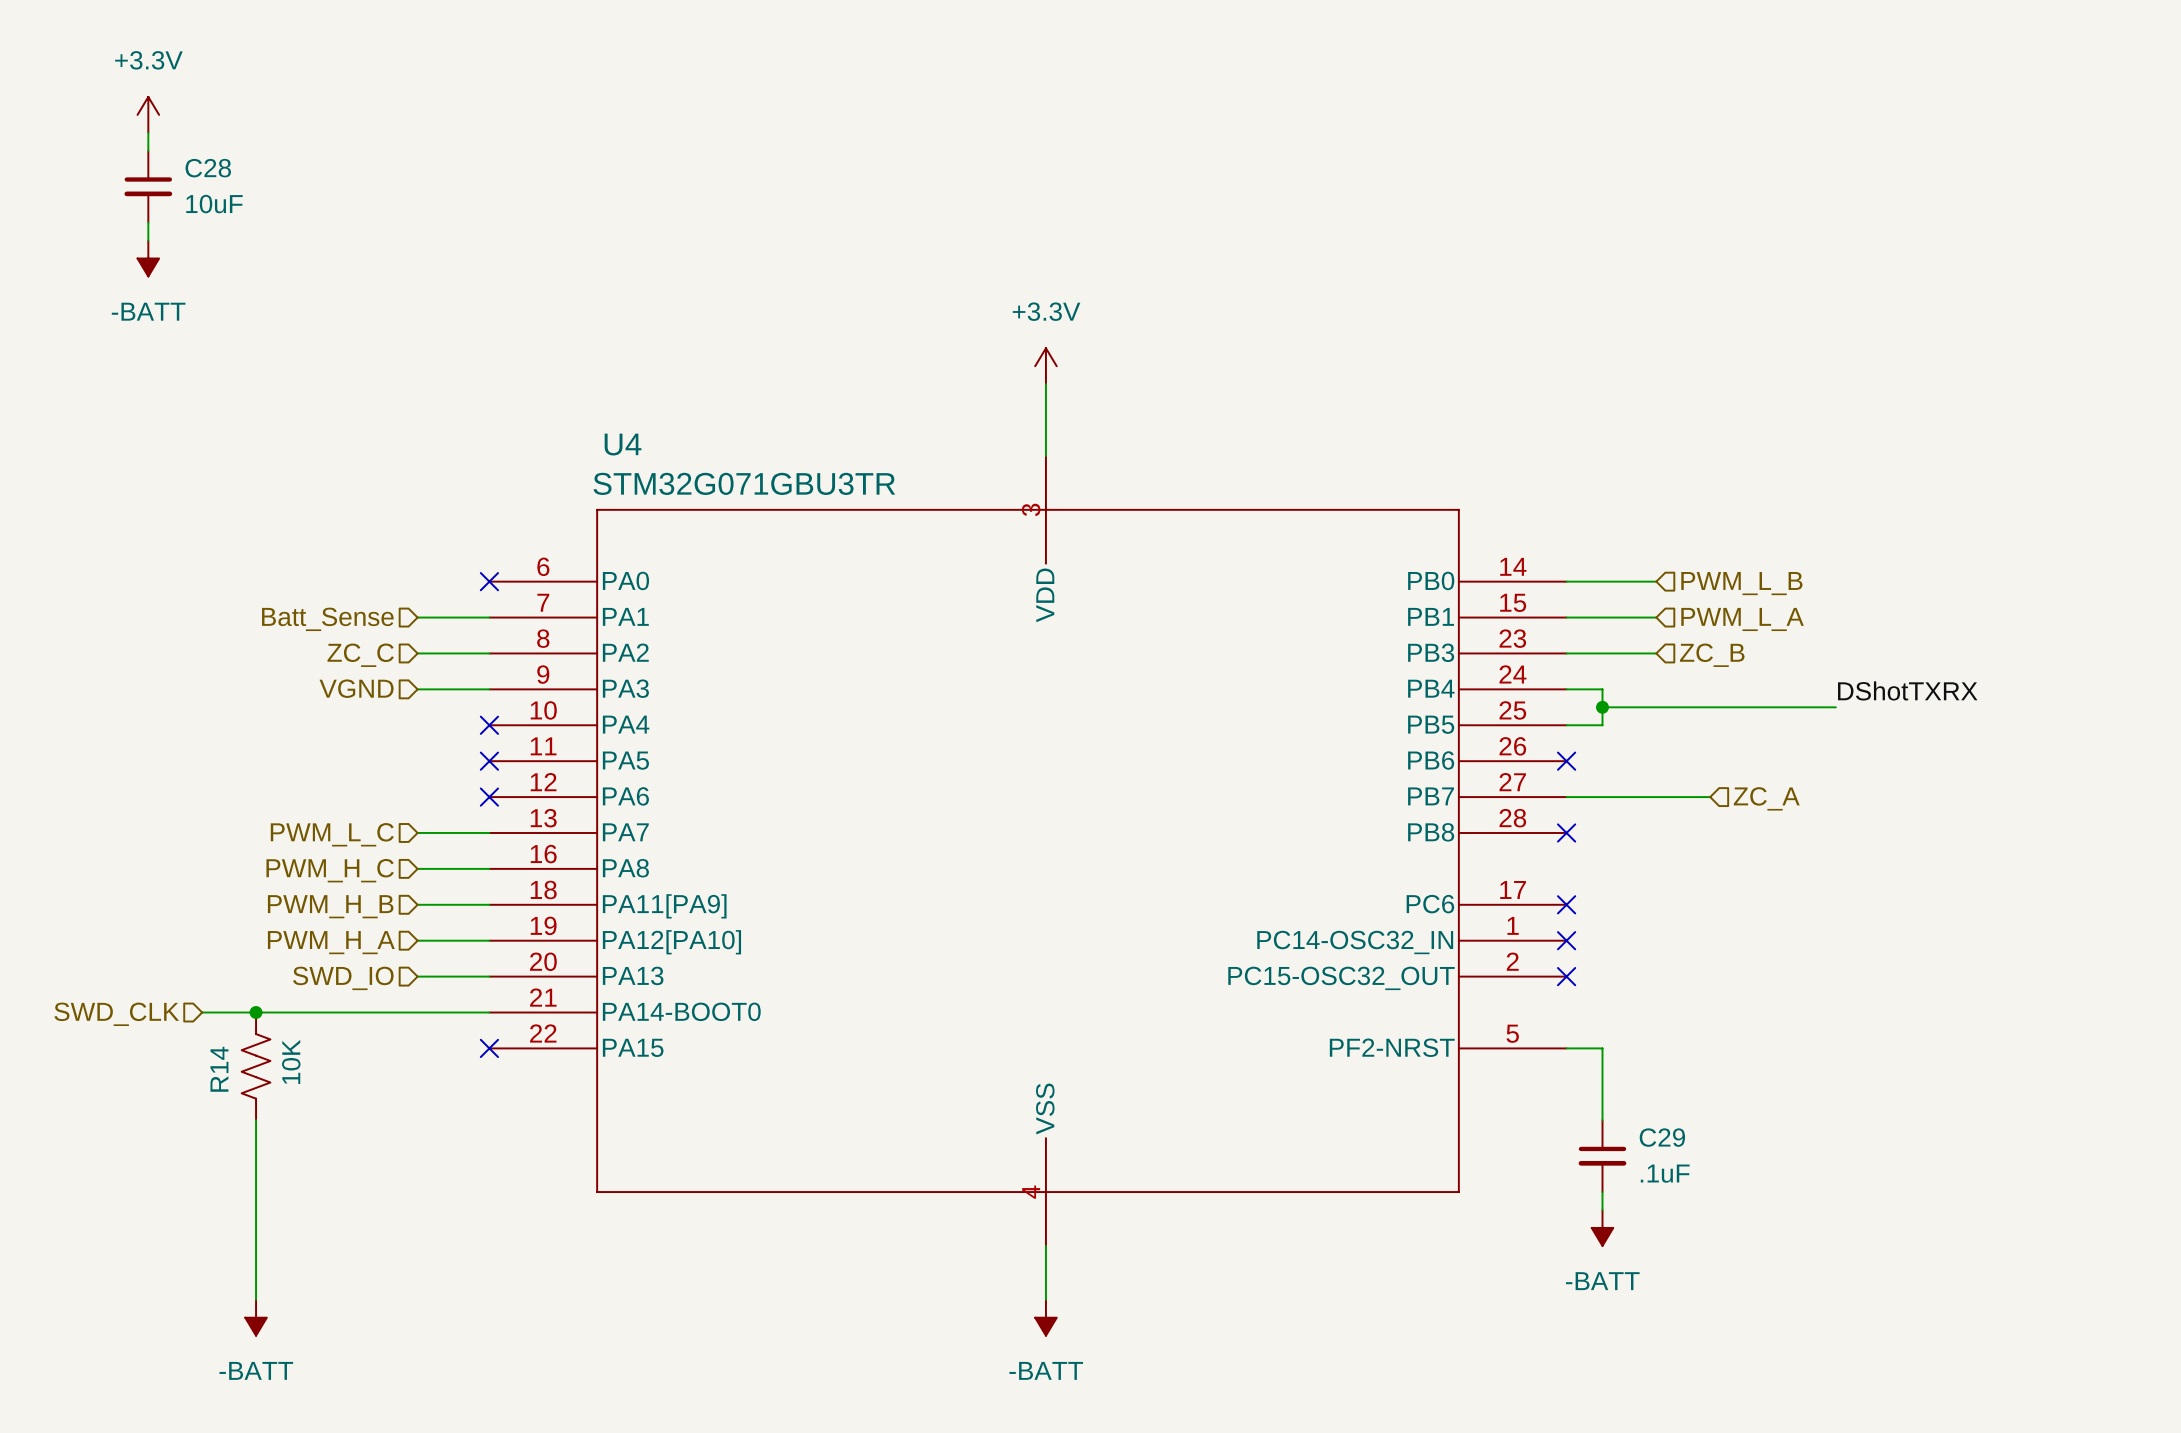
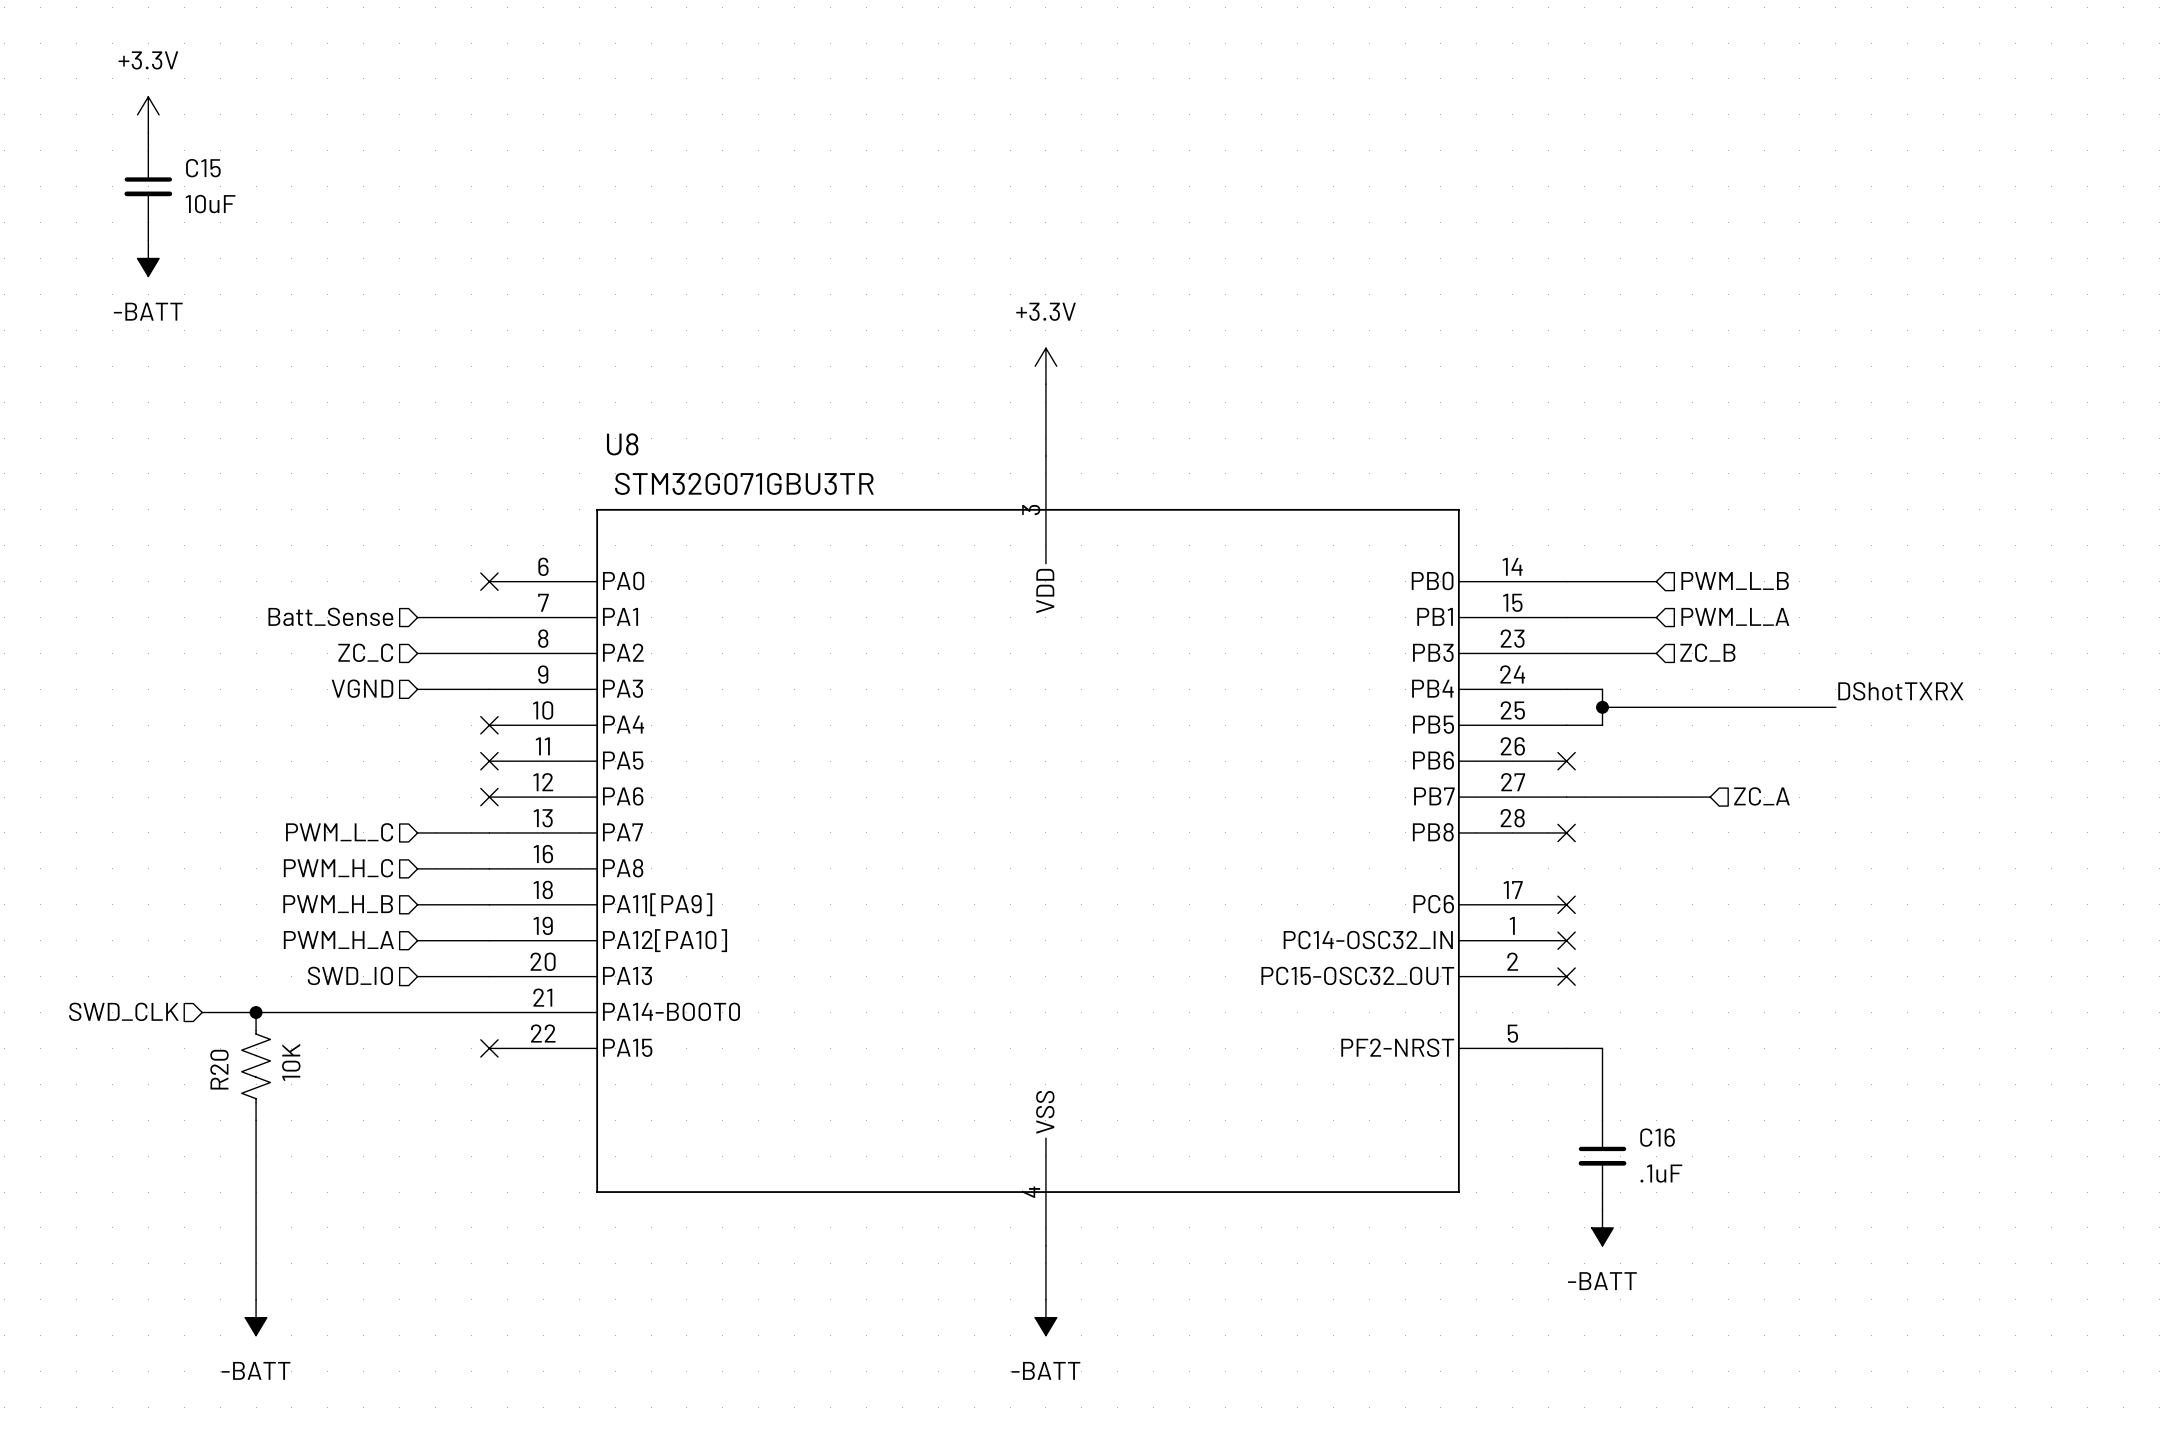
C28 name: C28 (208, 168) -> C15 (203, 168)
U4 name: U4 (623, 444) -> U8 (622, 444)
R14 name: R14 (219, 1069) -> R20 (219, 1069)
C29 name: C29 (1662, 1137) -> C16 (1657, 1137)

